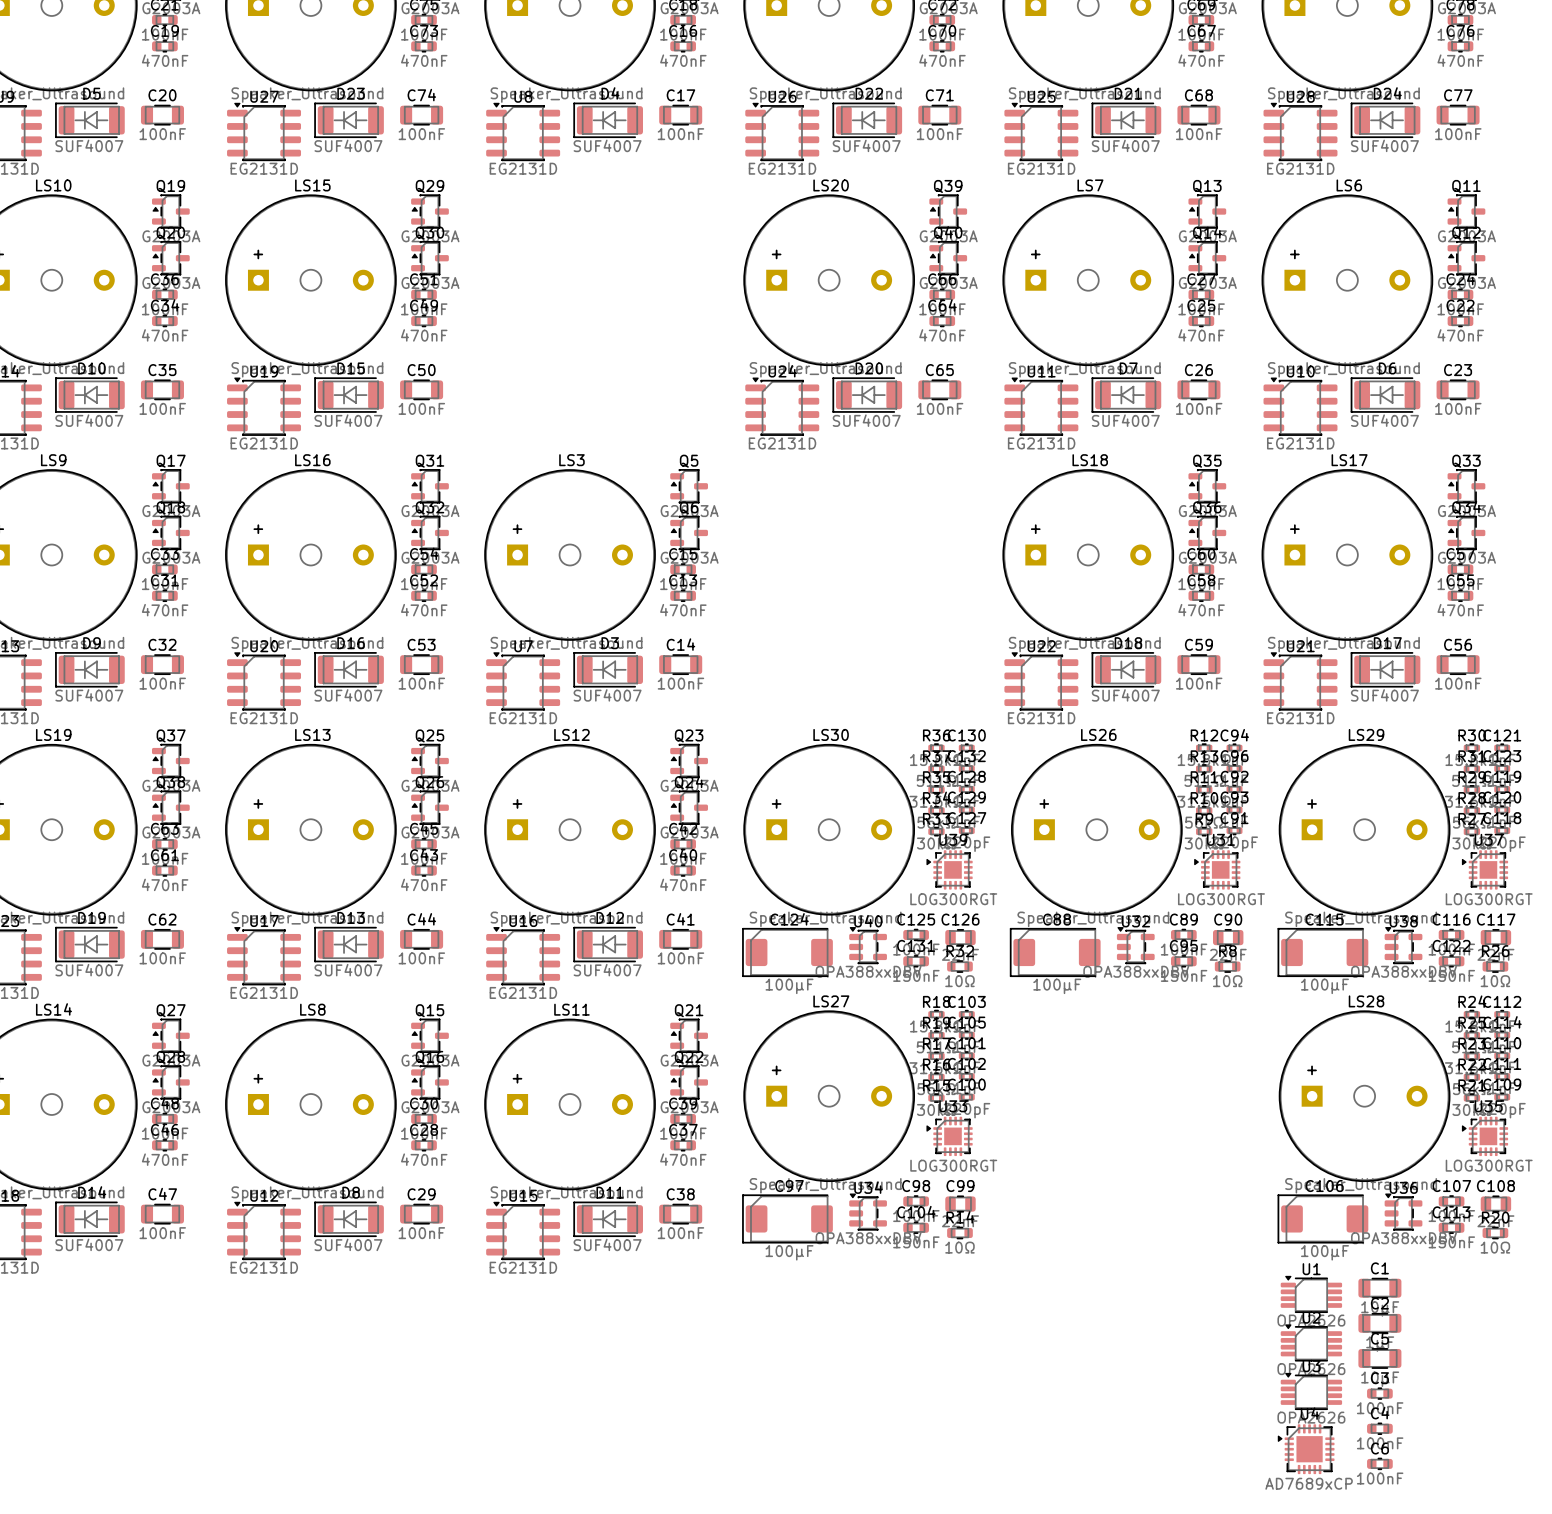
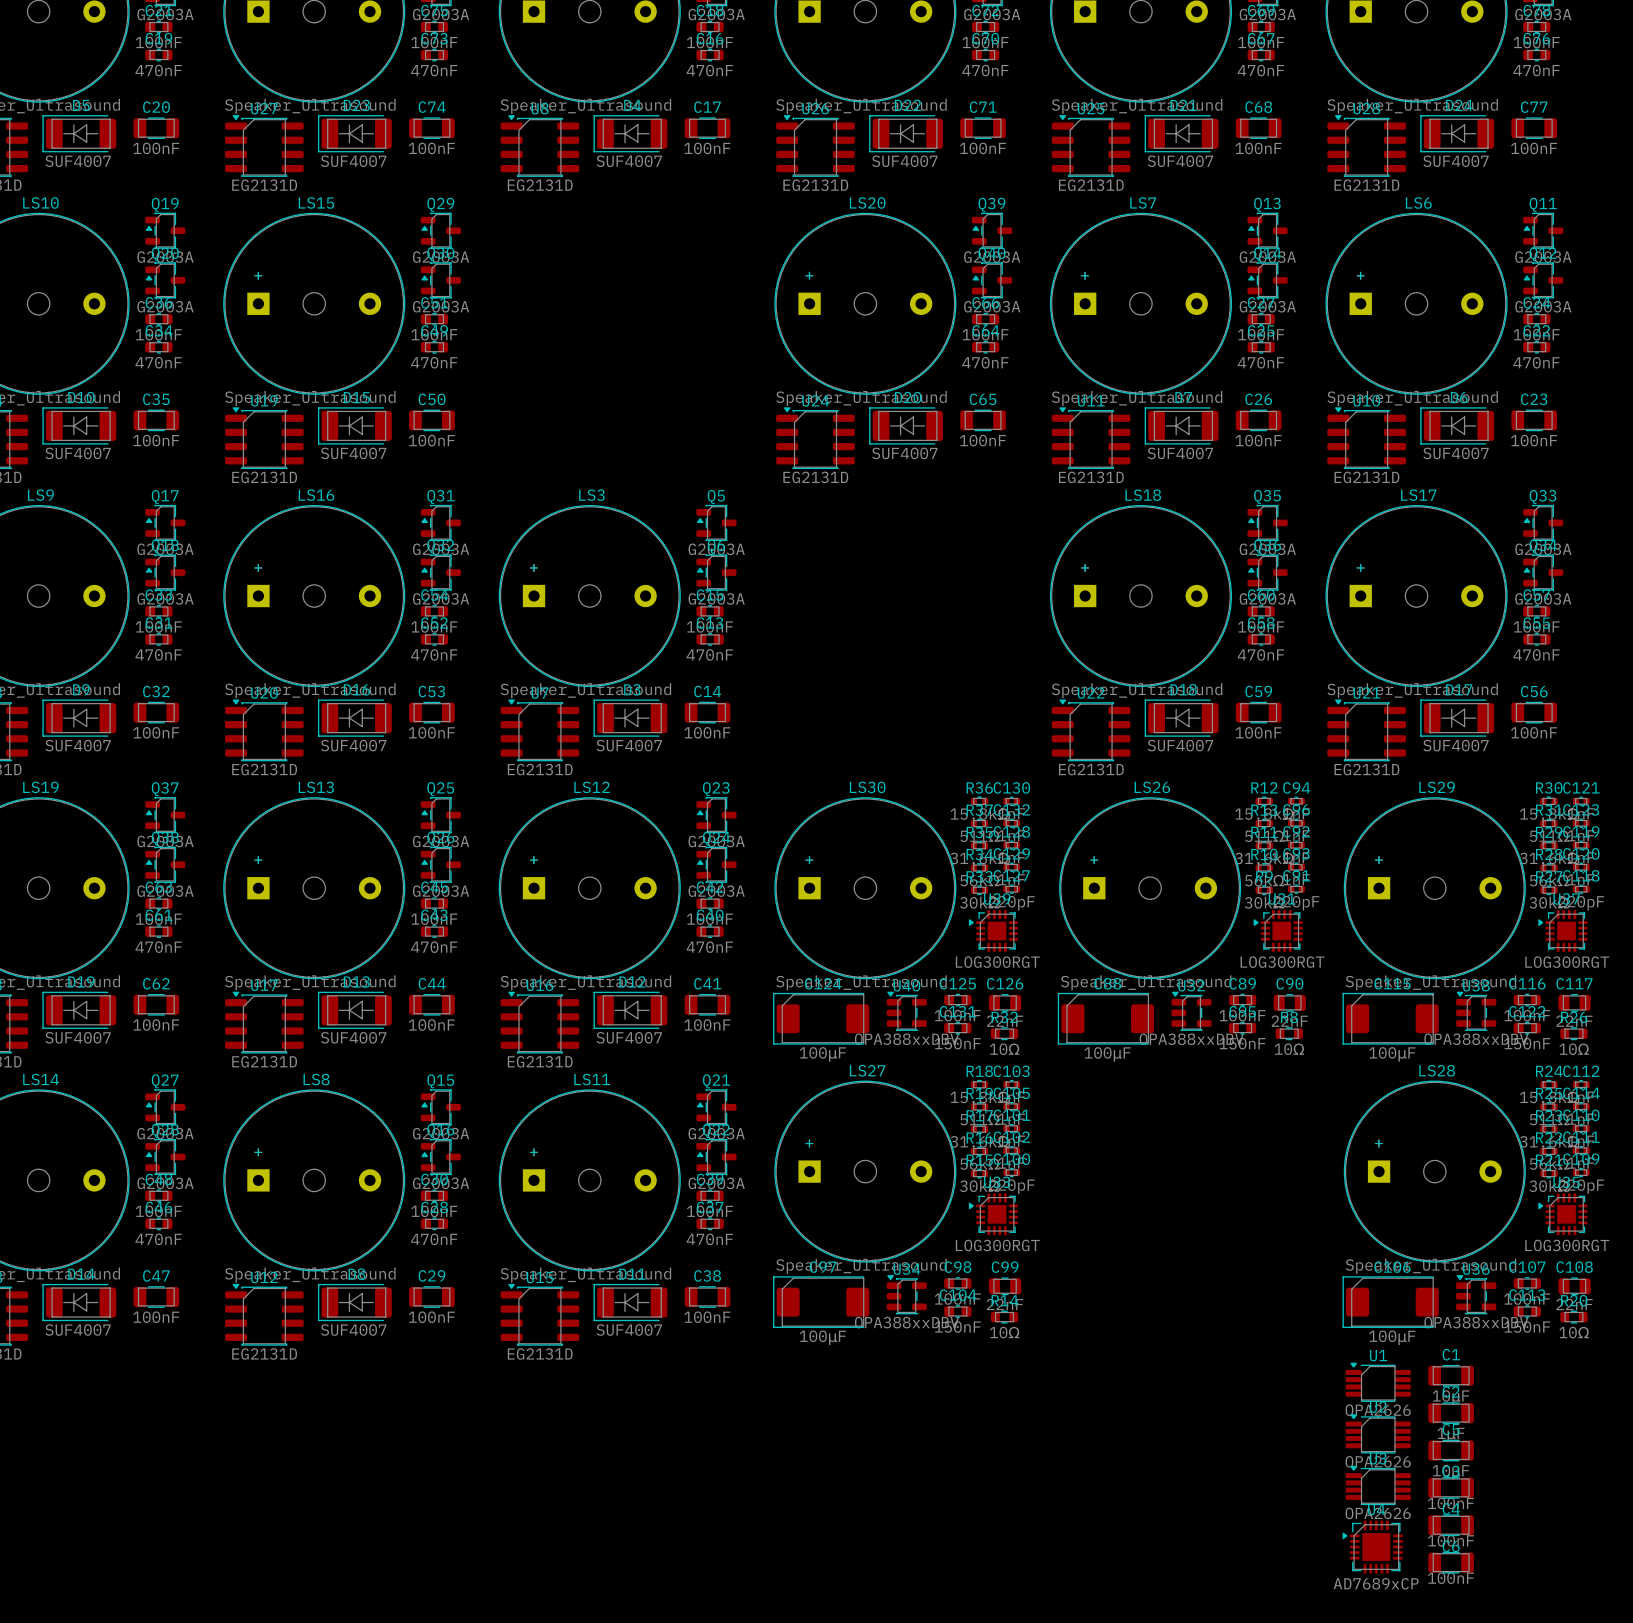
C3 footprint: [1367, 1387, 1393, 1400] -> [1428, 1477, 1474, 1499]
C4 footprint: [1367, 1422, 1393, 1435] -> [1428, 1514, 1474, 1537]
C6 footprint: [1367, 1457, 1393, 1470] -> [1428, 1551, 1474, 1574]

